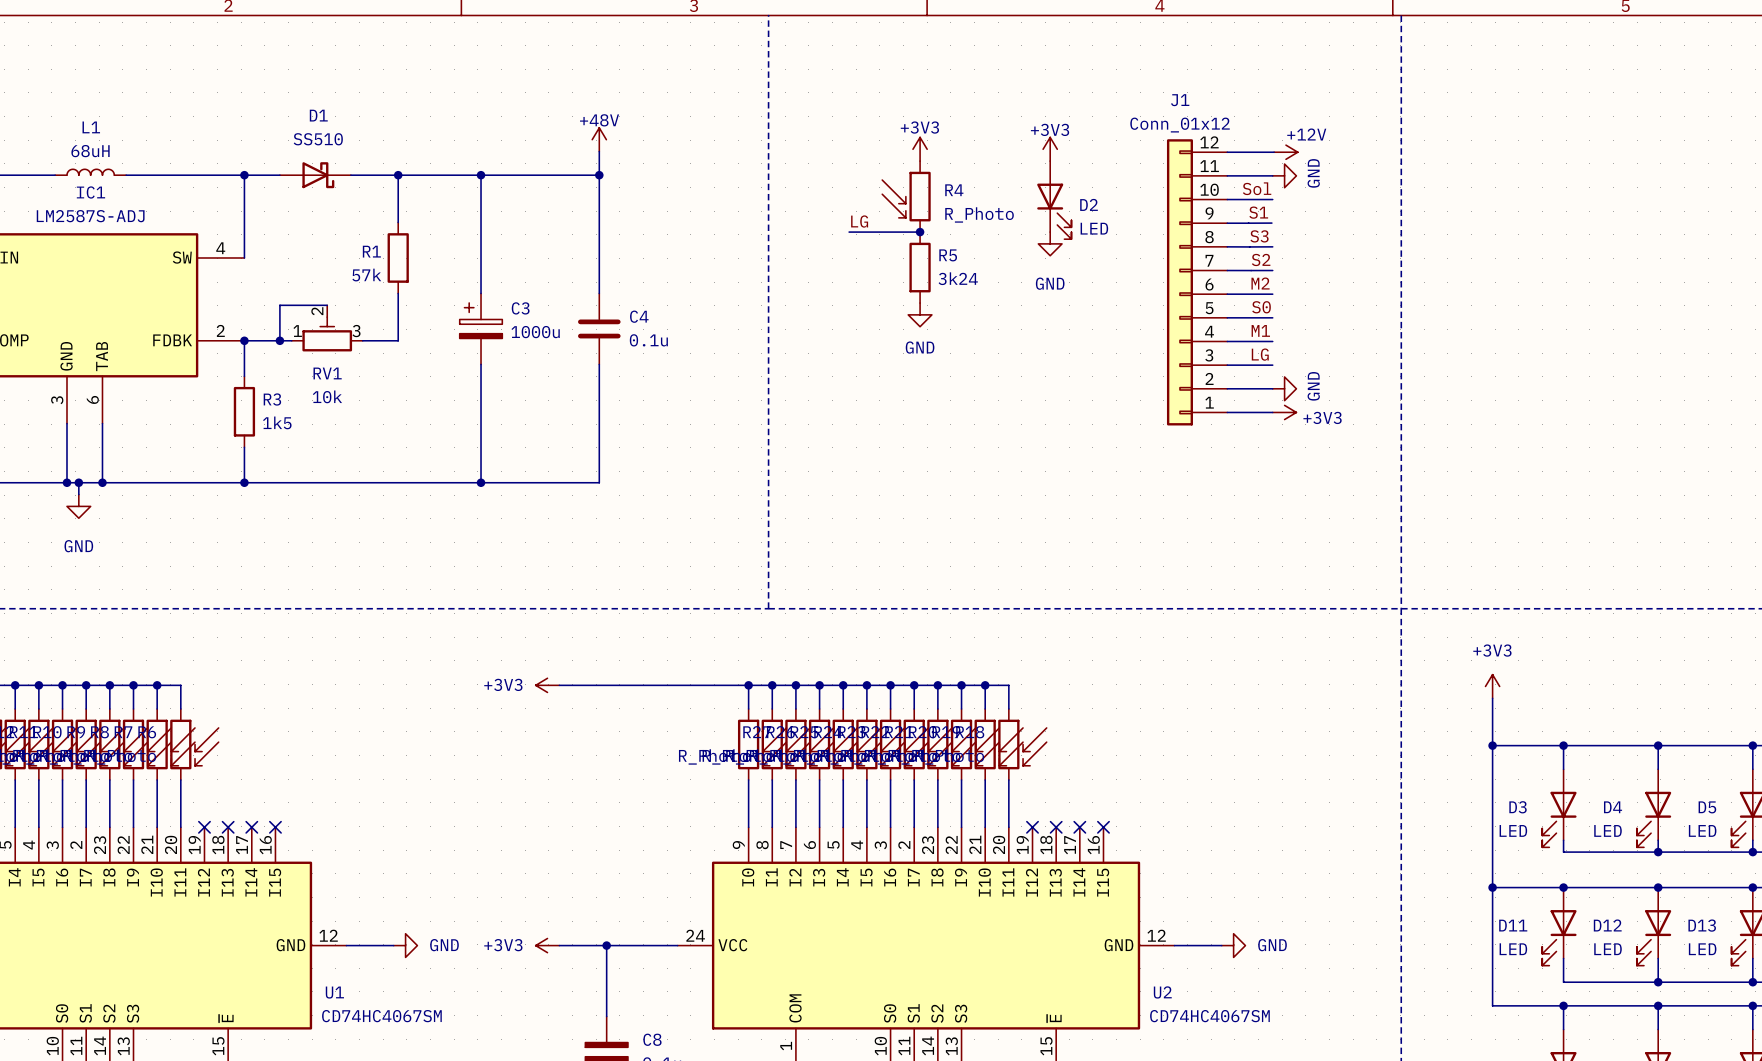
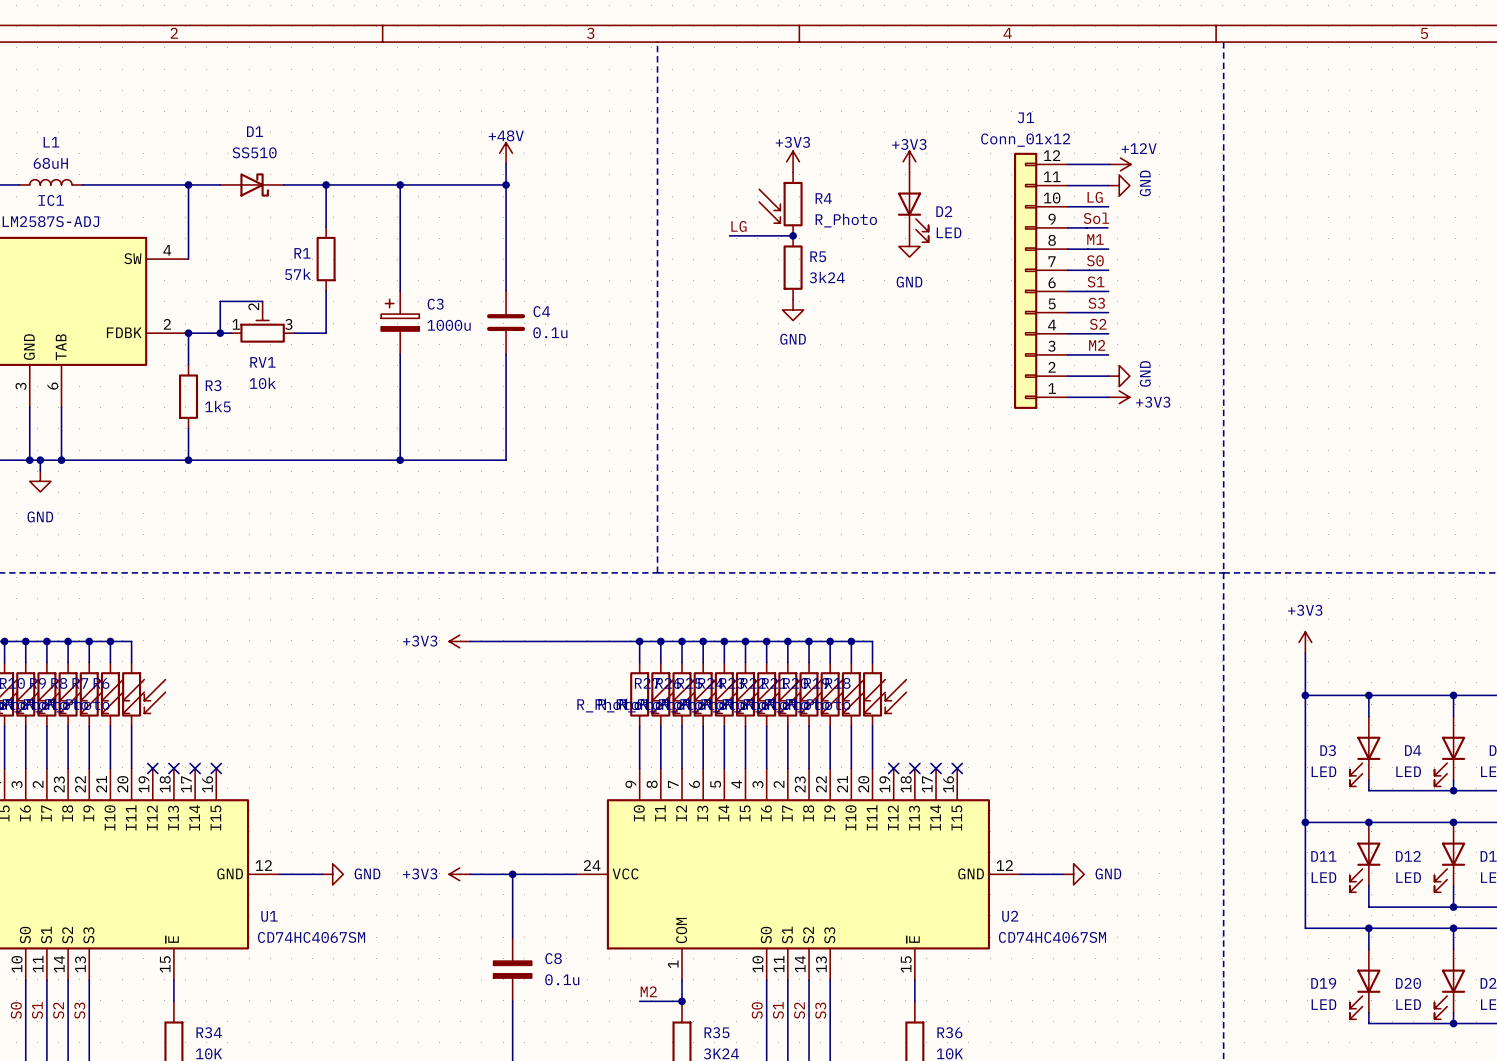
label: Sol (1257, 188) -> LG (1095, 197)
label: S1 (1258, 212) -> Sol (1096, 218)
label: S3 (1259, 236) -> M1 (1095, 239)
label: S2 (1261, 259) -> S0 (1095, 260)
label: M2 (1260, 283) -> S1 (1096, 281)
label: S0 (1261, 307) -> S3 (1096, 303)
label: M1 (1260, 330) -> S2 (1098, 324)
label: LG (1260, 354) -> M2 (1097, 345)

